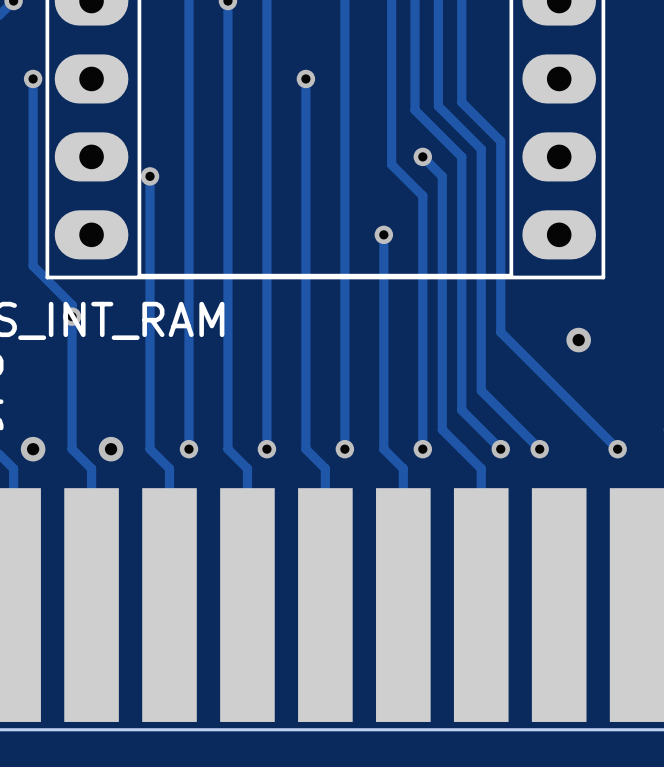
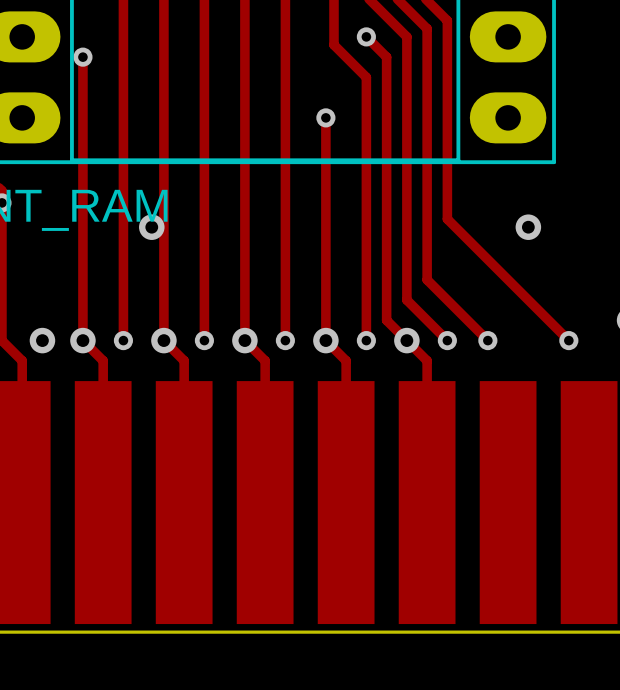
via: none -> (151, 227)
via: none -> (82, 340)
via: none -> (163, 340)
via: none -> (244, 340)
via: none -> (325, 340)
via: none -> (406, 340)

